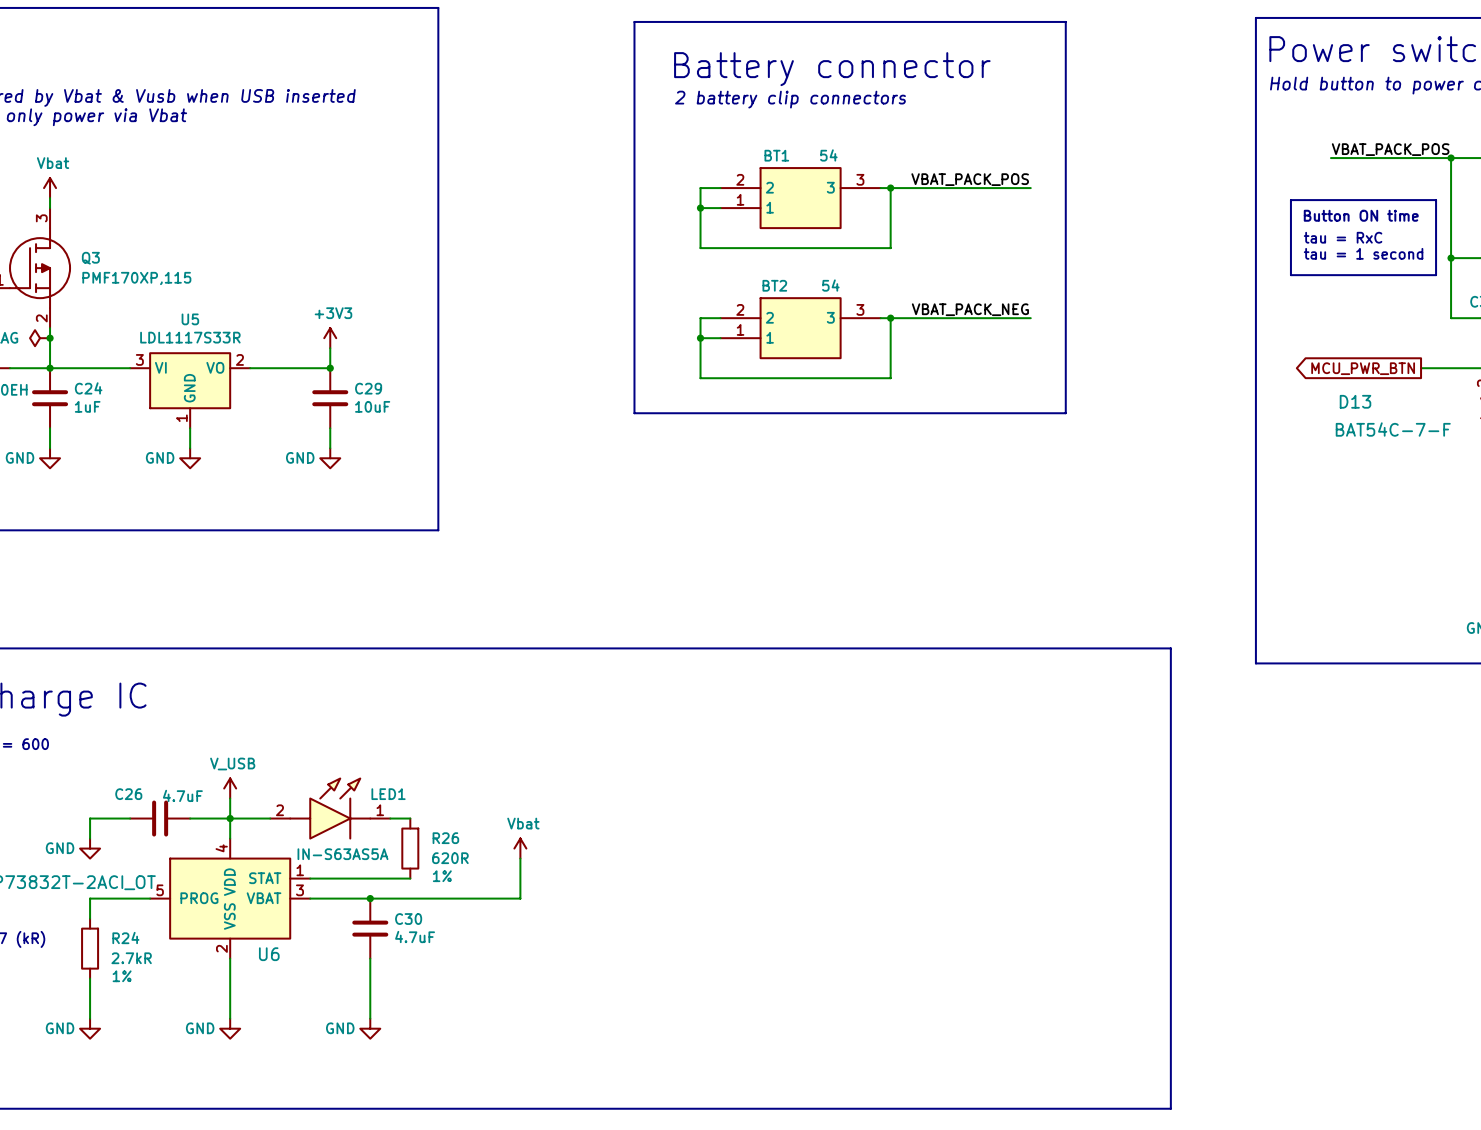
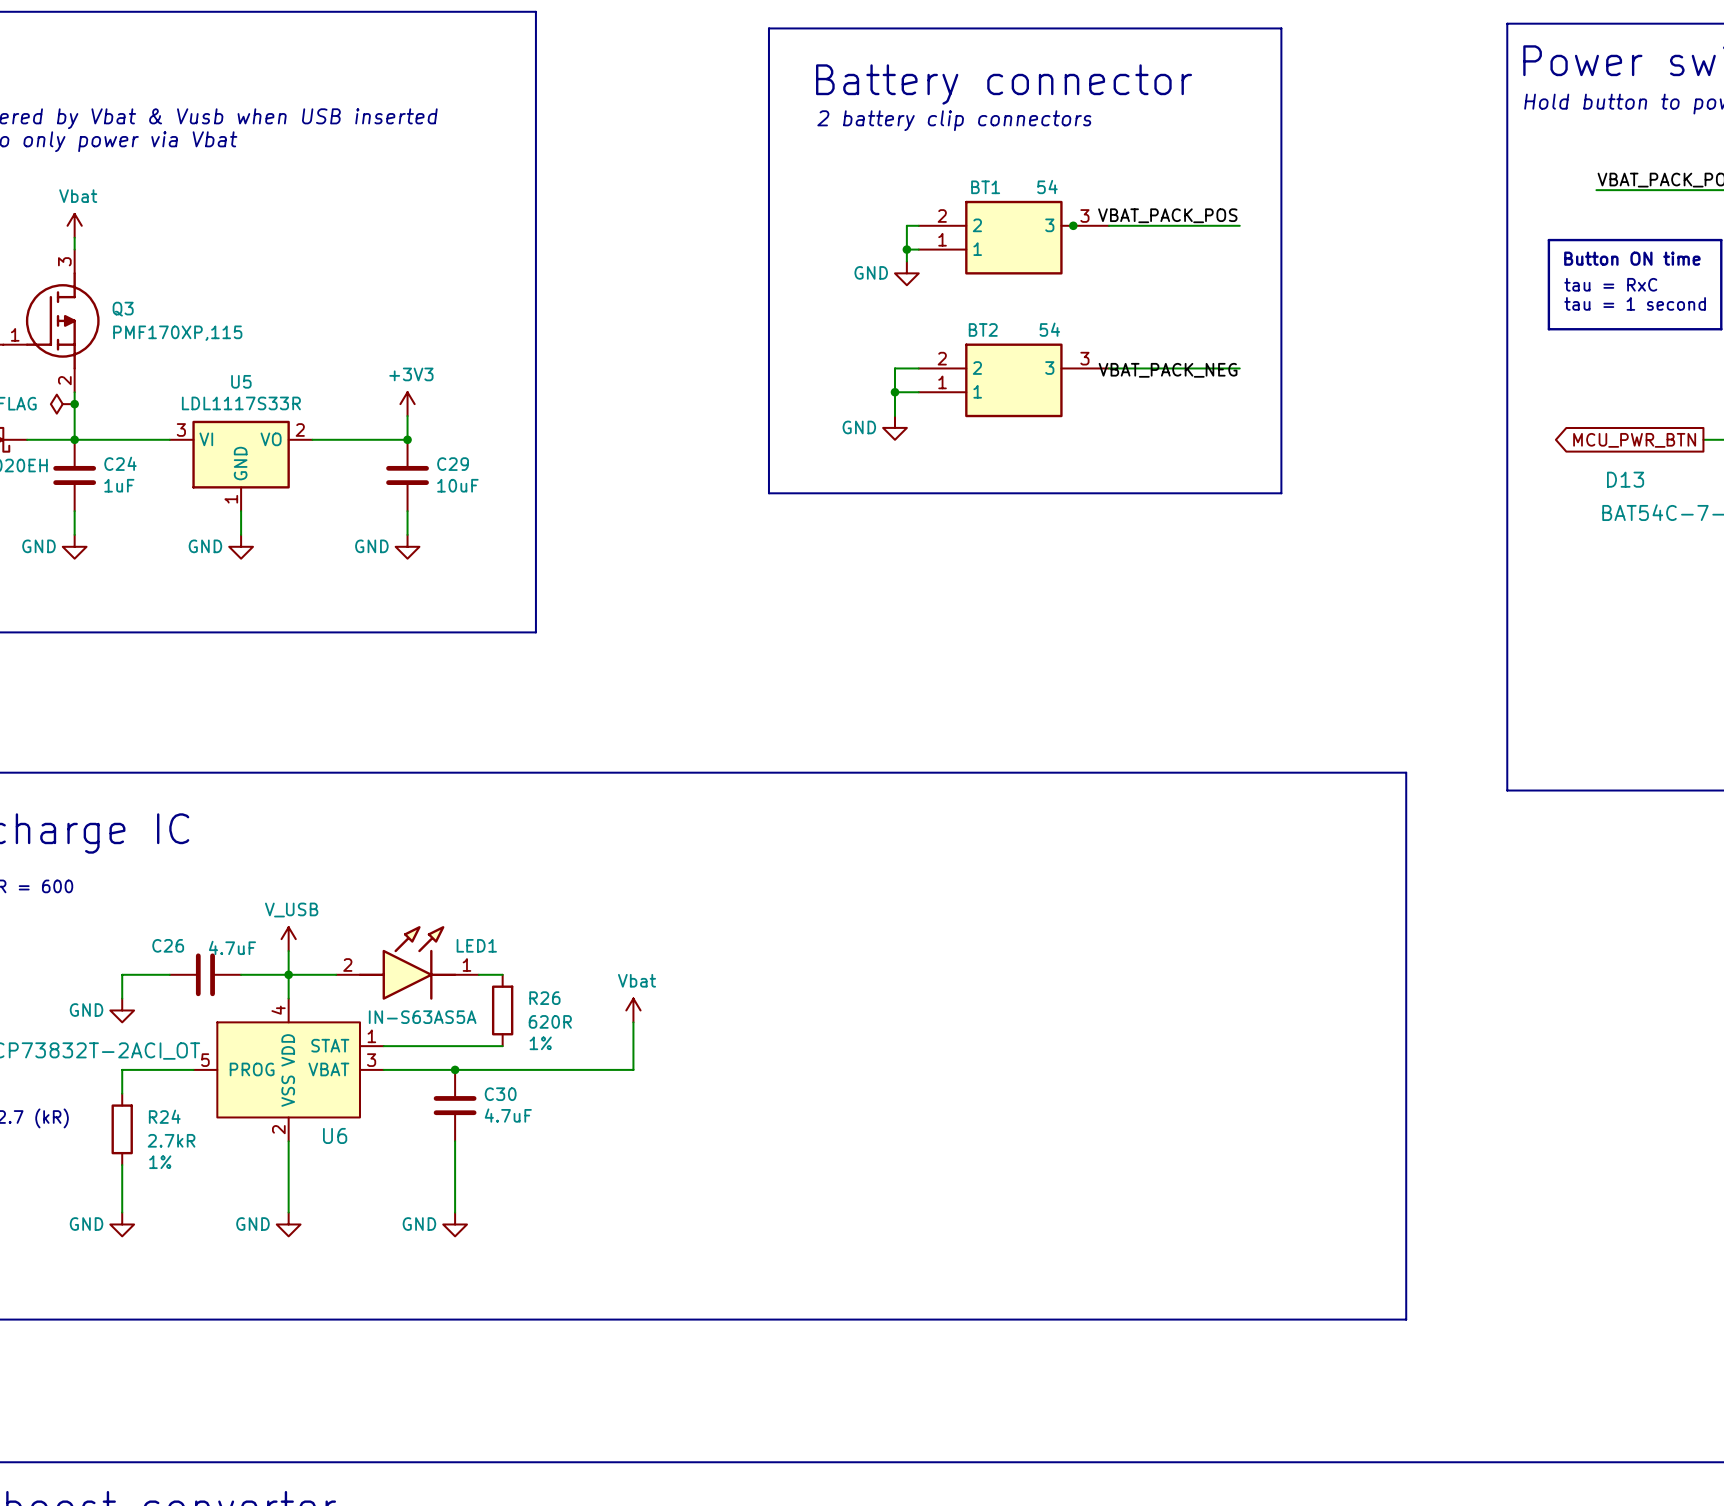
wire: (720, 188) (700, 188) (700, 248) (890, 248) (890, 188) -> none
wire: none -> (918, 225) (906, 225) (906, 261)
BT1 position: (800, 198) -> (1013, 237)
wire: (700, 208) (720, 208) -> none
junction: (700, 208) -> none
junction: none -> (906, 249)
power symbol: none -> GND (906, 273)
wire: none -> (918, 368) (894, 368) (894, 416)
wire: none -> (1108, 368) (1239, 368)
wire: (720, 318) (700, 318) (700, 378) (890, 378) (890, 318) -> none
wire: (880, 318) (1030, 318) -> none
junction: (890, 318) -> none
BT2 position: (800, 328) -> (1013, 380)
wire: (700, 338) (720, 338) -> (894, 392) (918, 392)
junction position: (700, 338) -> (894, 392)
power symbol: none -> GND (894, 427)

